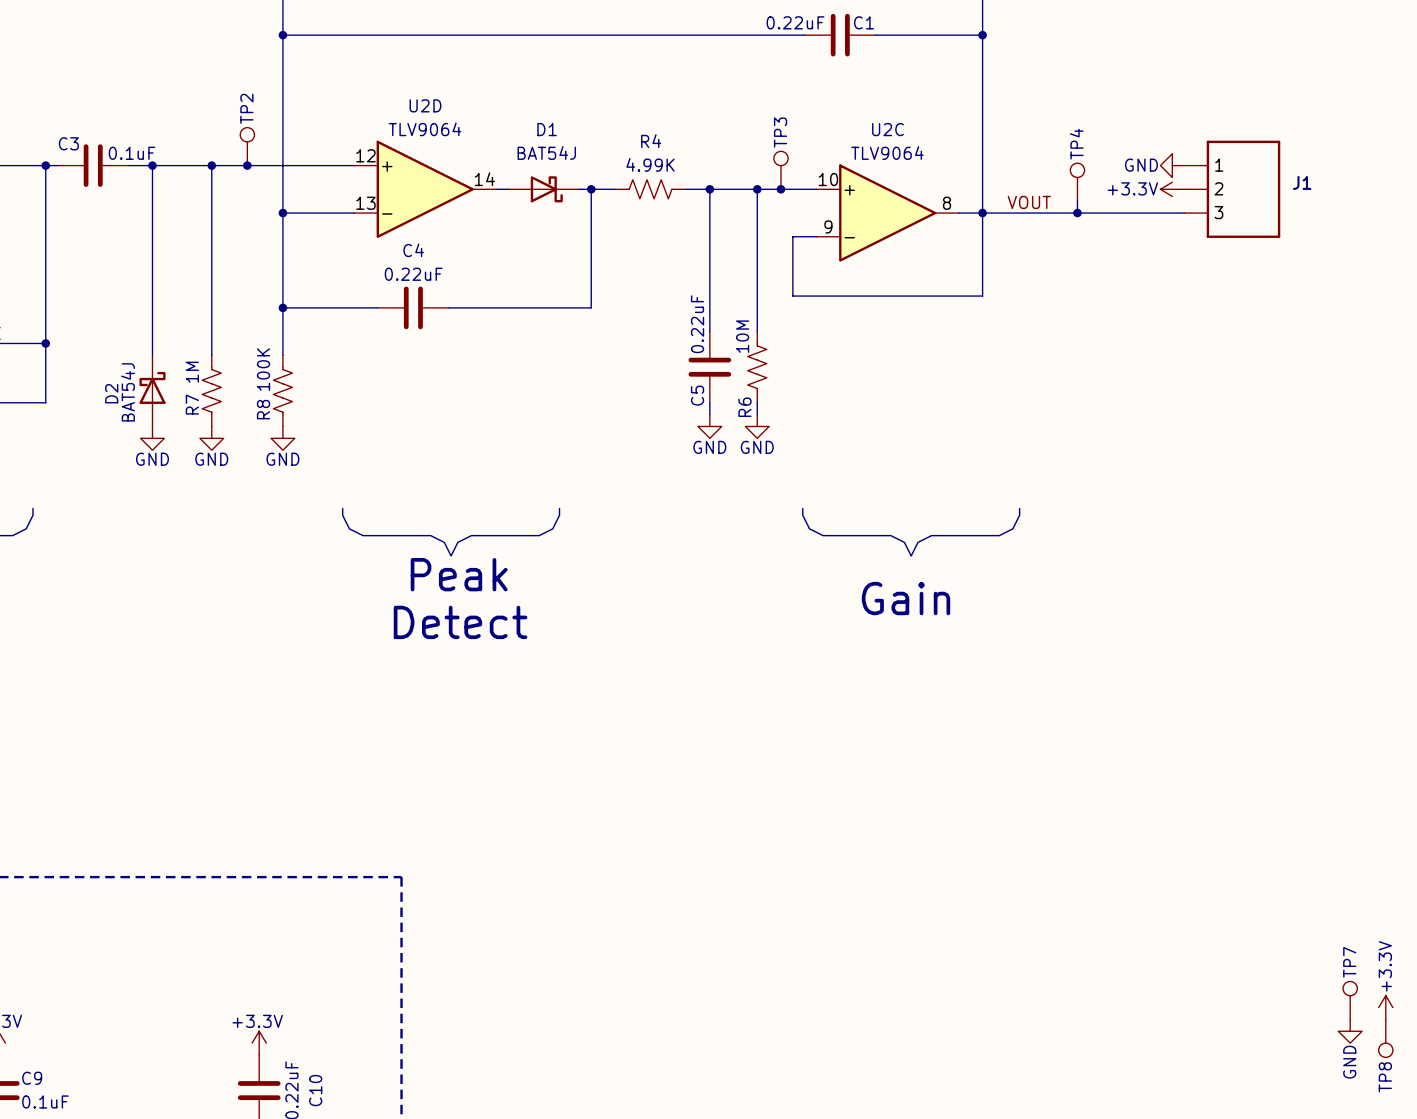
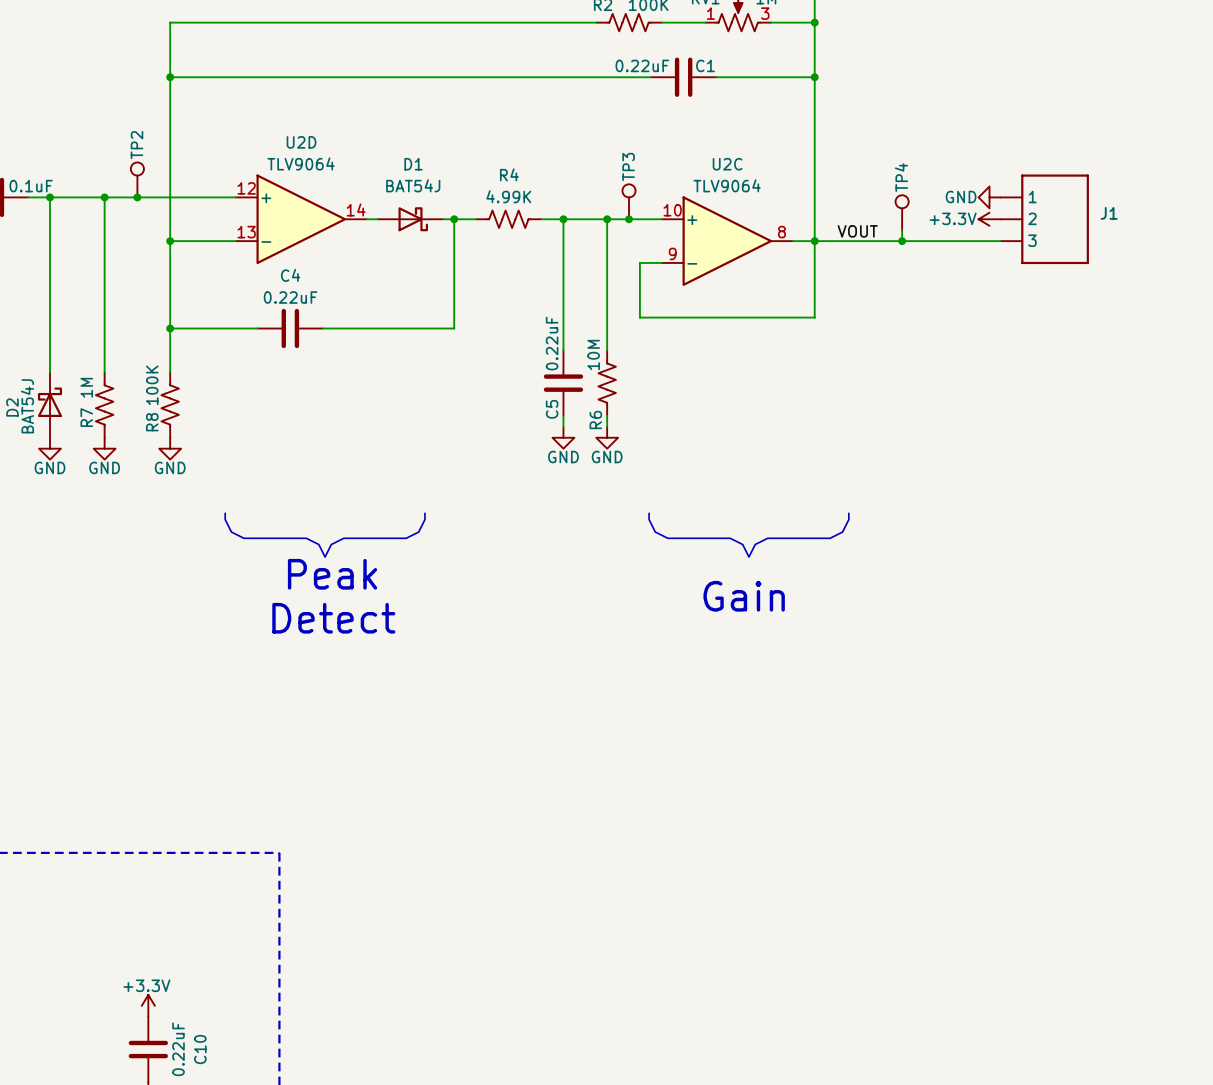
TP7: (1350, 1000) -> none
power symbol: +3.3V (1385, 1007) -> none
power symbol: GND (1350, 1031) -> none
TP8: (1385, 1038) -> none

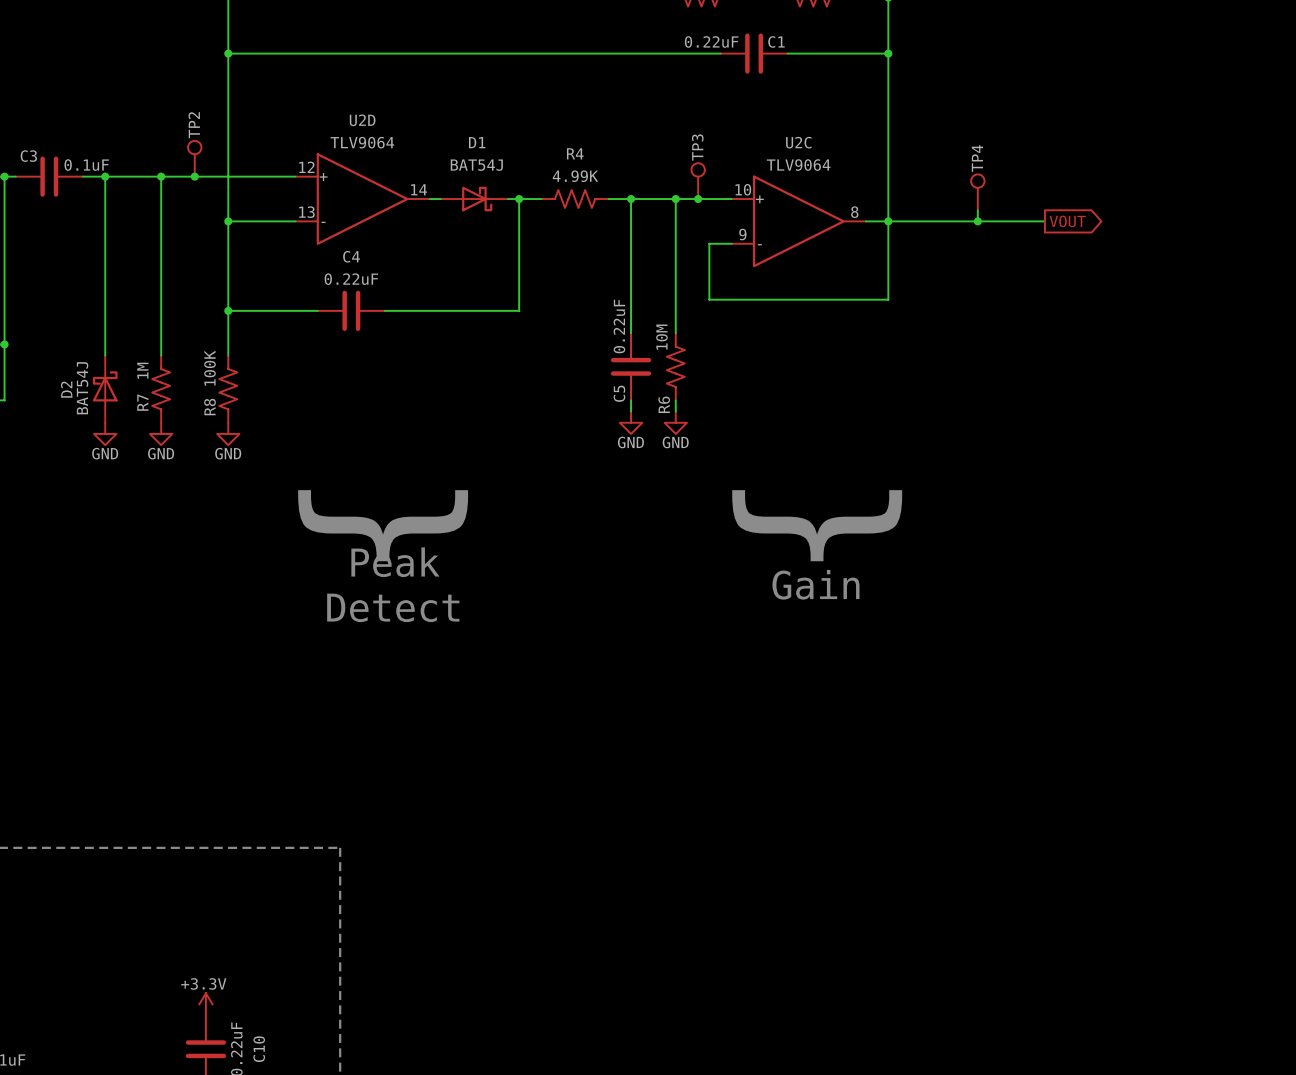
power symbol: GND (989, 197) -> none
power symbol: +3.3V (989, 219) -> none
J1: (1044, 219) -> none
label: VOUT (857, 231) -> none
wire: (967, 241) (1000, 241) -> none
global label: none -> VOUT (1067, 221)

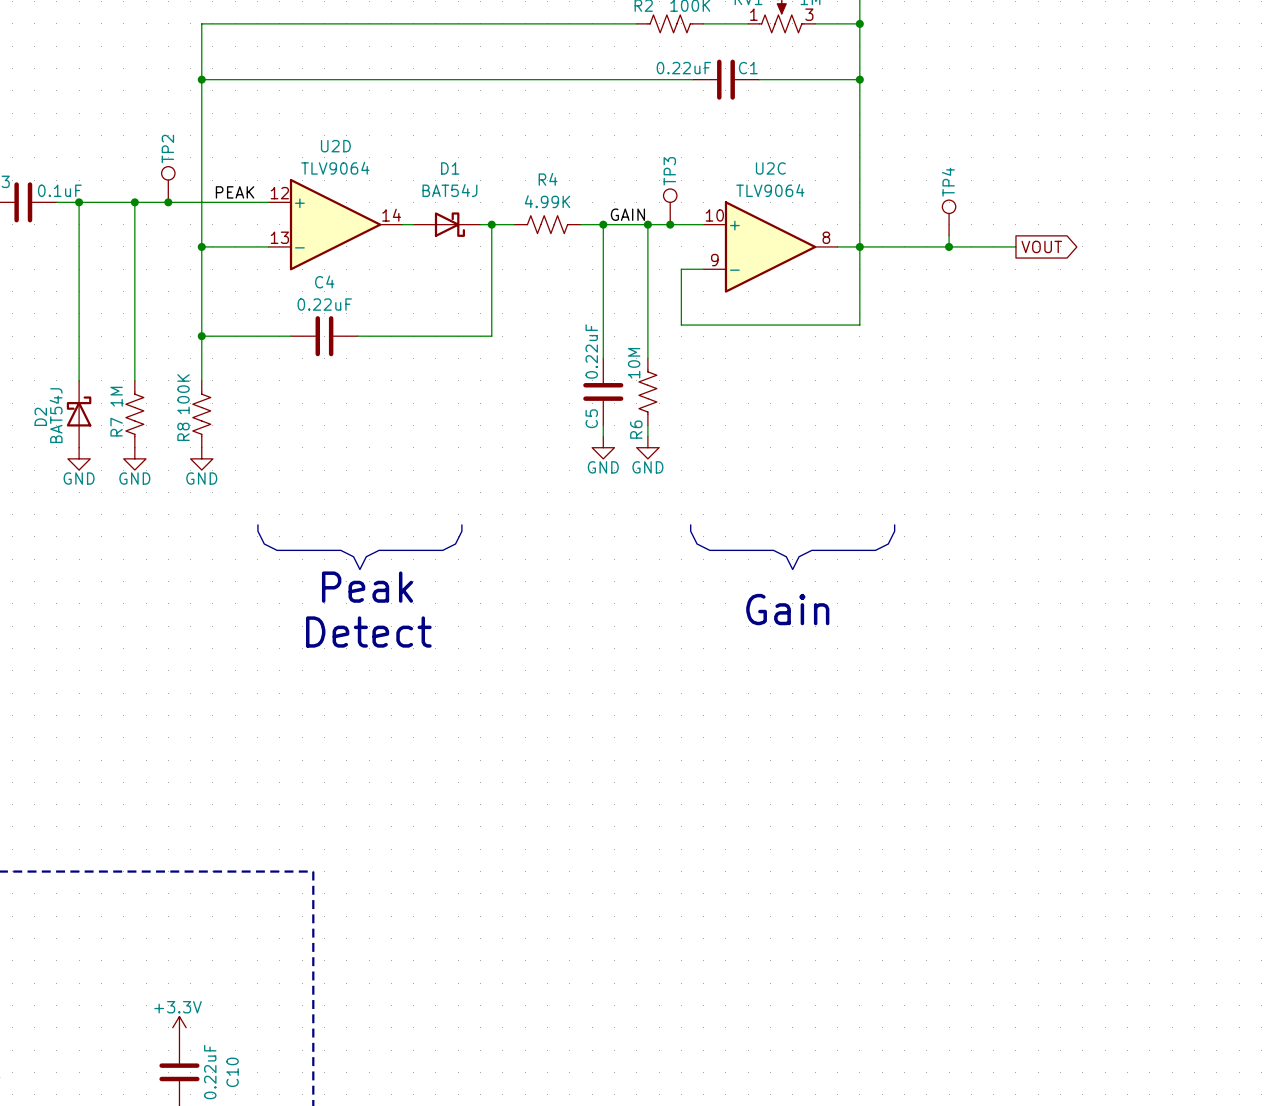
label: none -> PEAK (235, 192)
label: none -> GAIN (627, 214)

